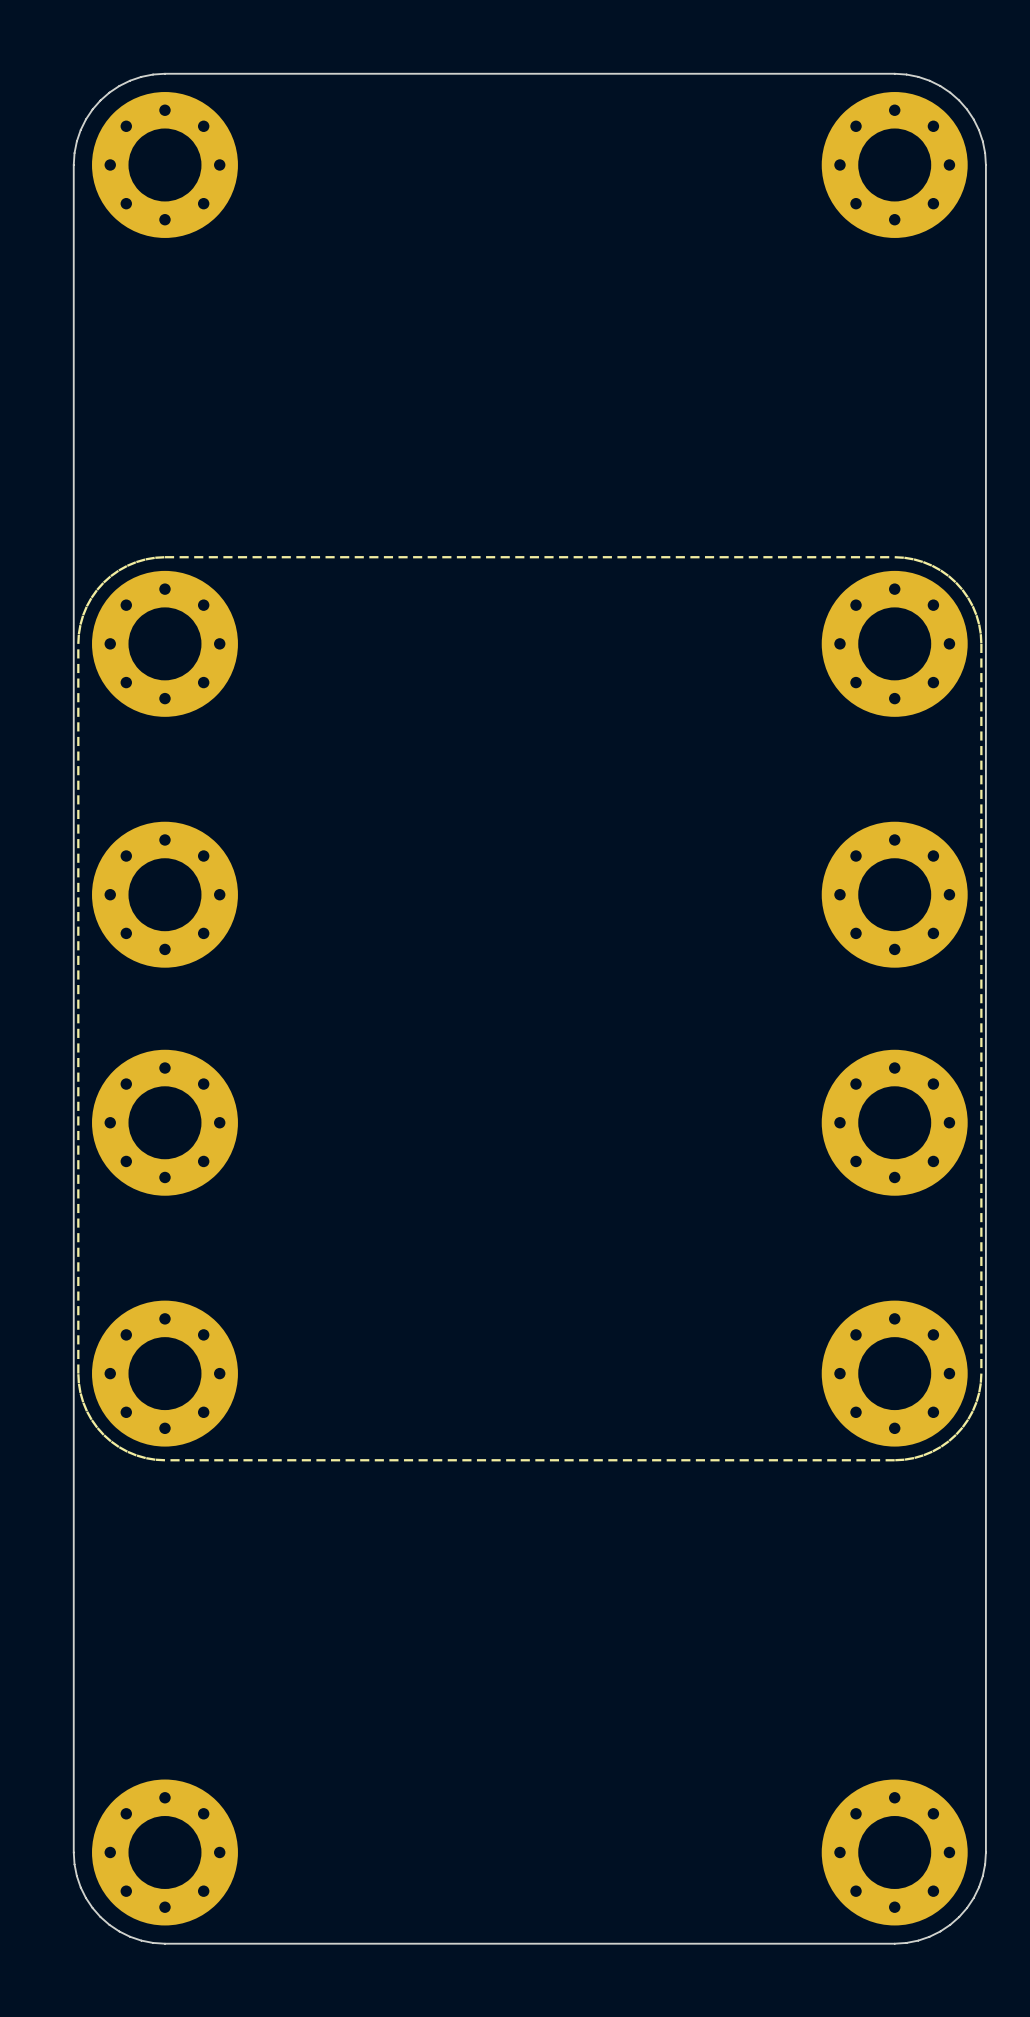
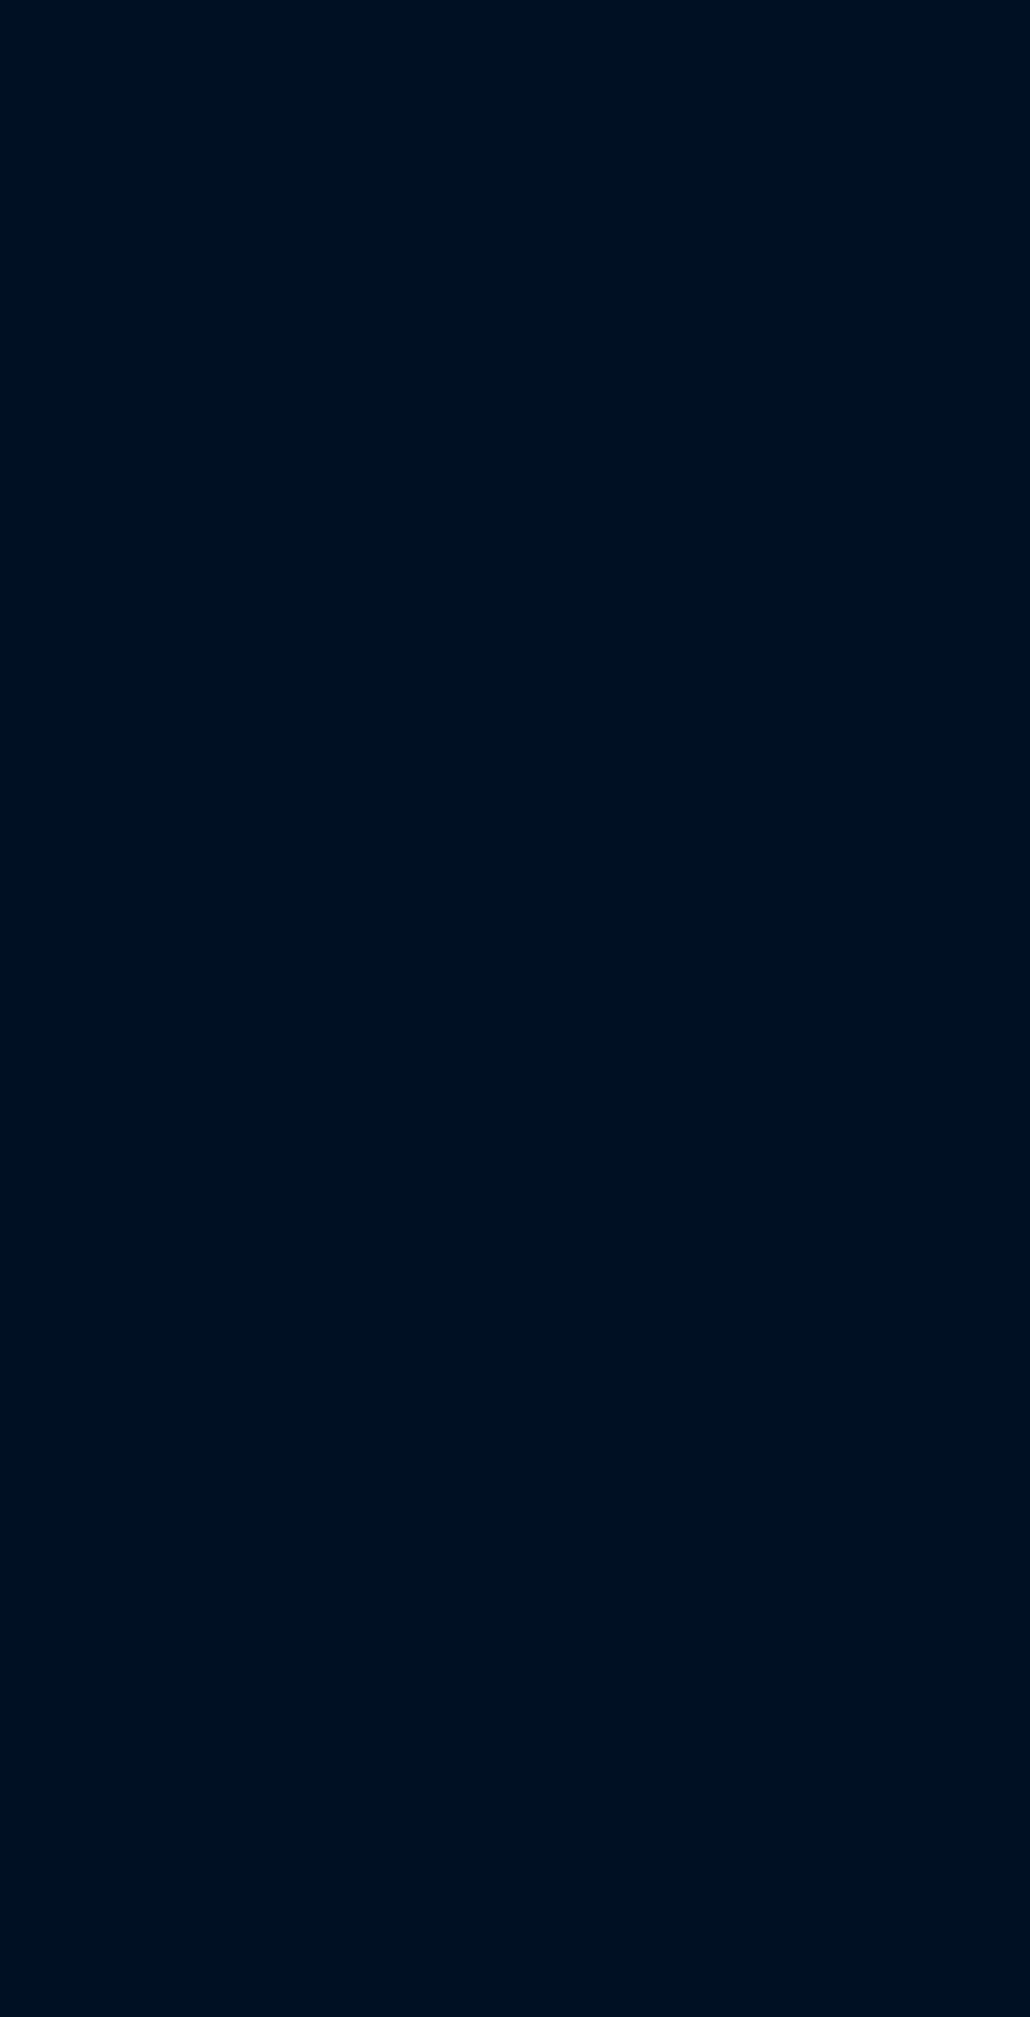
board edge: (894, 73) (153, 74) (130, 80) (109, 92) (92, 109) (80, 130) (76, 141) (73, 164) (73, 1852) (76, 1876) (80, 1887) (92, 1908) (109, 1924) (130, 1936) (141, 1940) (164, 1943) (894, 1943) (918, 1940) (929, 1936) (950, 1924) (967, 1908) (978, 1887) (982, 1876) (985, 1852) (985, 164) (985, 153) (978, 130) (967, 109) (959, 100) (940, 85) (929, 80) (906, 74) (894, 73) -> none
part: (164, 164) -> none
part: (894, 164) -> none
line: (894, 557) (164, 557) (136, 562) (118, 570) (103, 582) (86, 606) (80, 624) (78, 643) (78, 1373) (80, 1392) (86, 1411) (103, 1434) (127, 1451) (145, 1458) (164, 1460) (894, 1460) (923, 1455) (940, 1446) (955, 1434) (972, 1411) (979, 1392) (981, 1373) (980, 634) (972, 606) (962, 589) (948, 576) (923, 562) (894, 557) -> none
part: (164, 643) -> none
part: (894, 643) -> none
part: (164, 894) -> none
part: (894, 894) -> none
part: (164, 1122) -> none
part: (894, 1122) -> none
part: (164, 1373) -> none
part: (894, 1373) -> none
part: (164, 1852) -> none
part: (894, 1852) -> none

